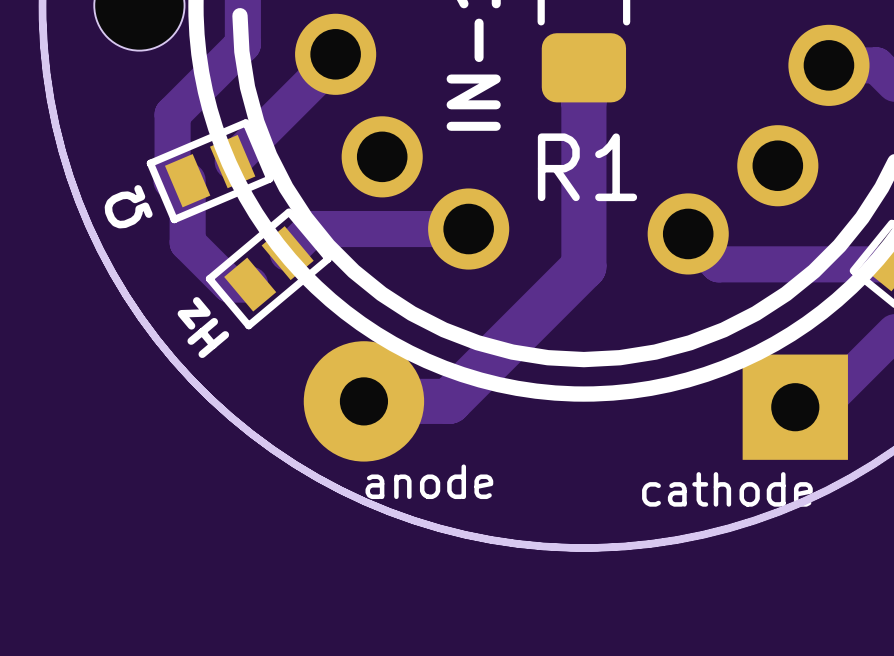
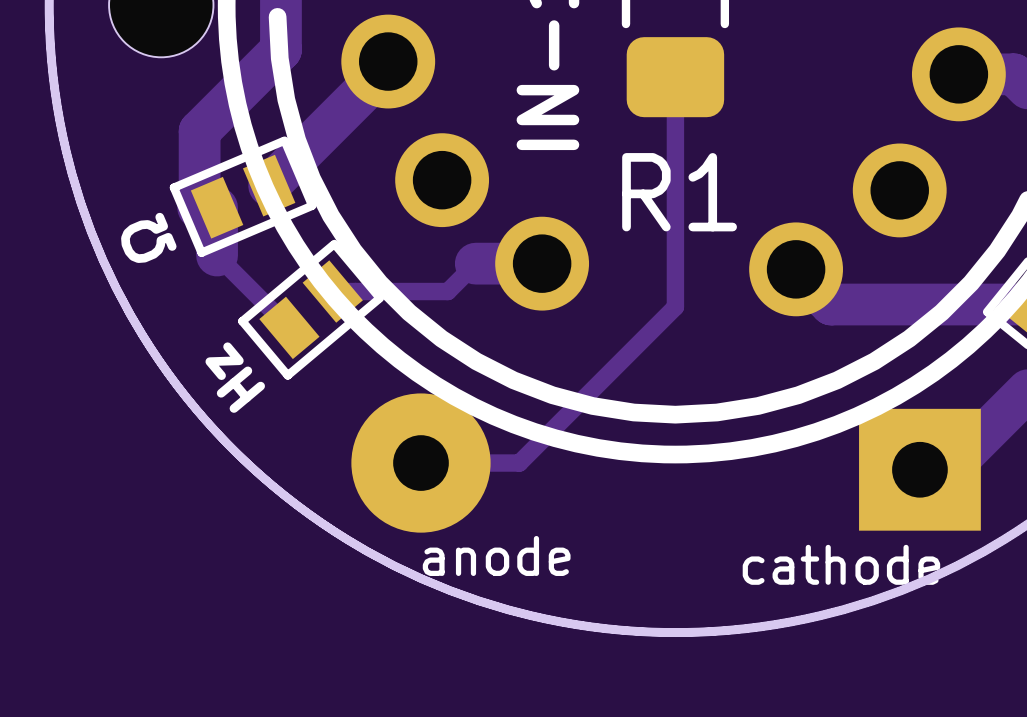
track width: thick (583, 67) (583, 266) (449, 401) (363, 401) -> thin (675, 77) (675, 307) (519, 463) (420, 463)
track: (187, 222) (187, 242) (229, 284) (250, 284) -> (217, 255) (289, 327)
track: (411, 229) (311, 229) (287, 253) -> (475, 263) (447, 291) (332, 291)

